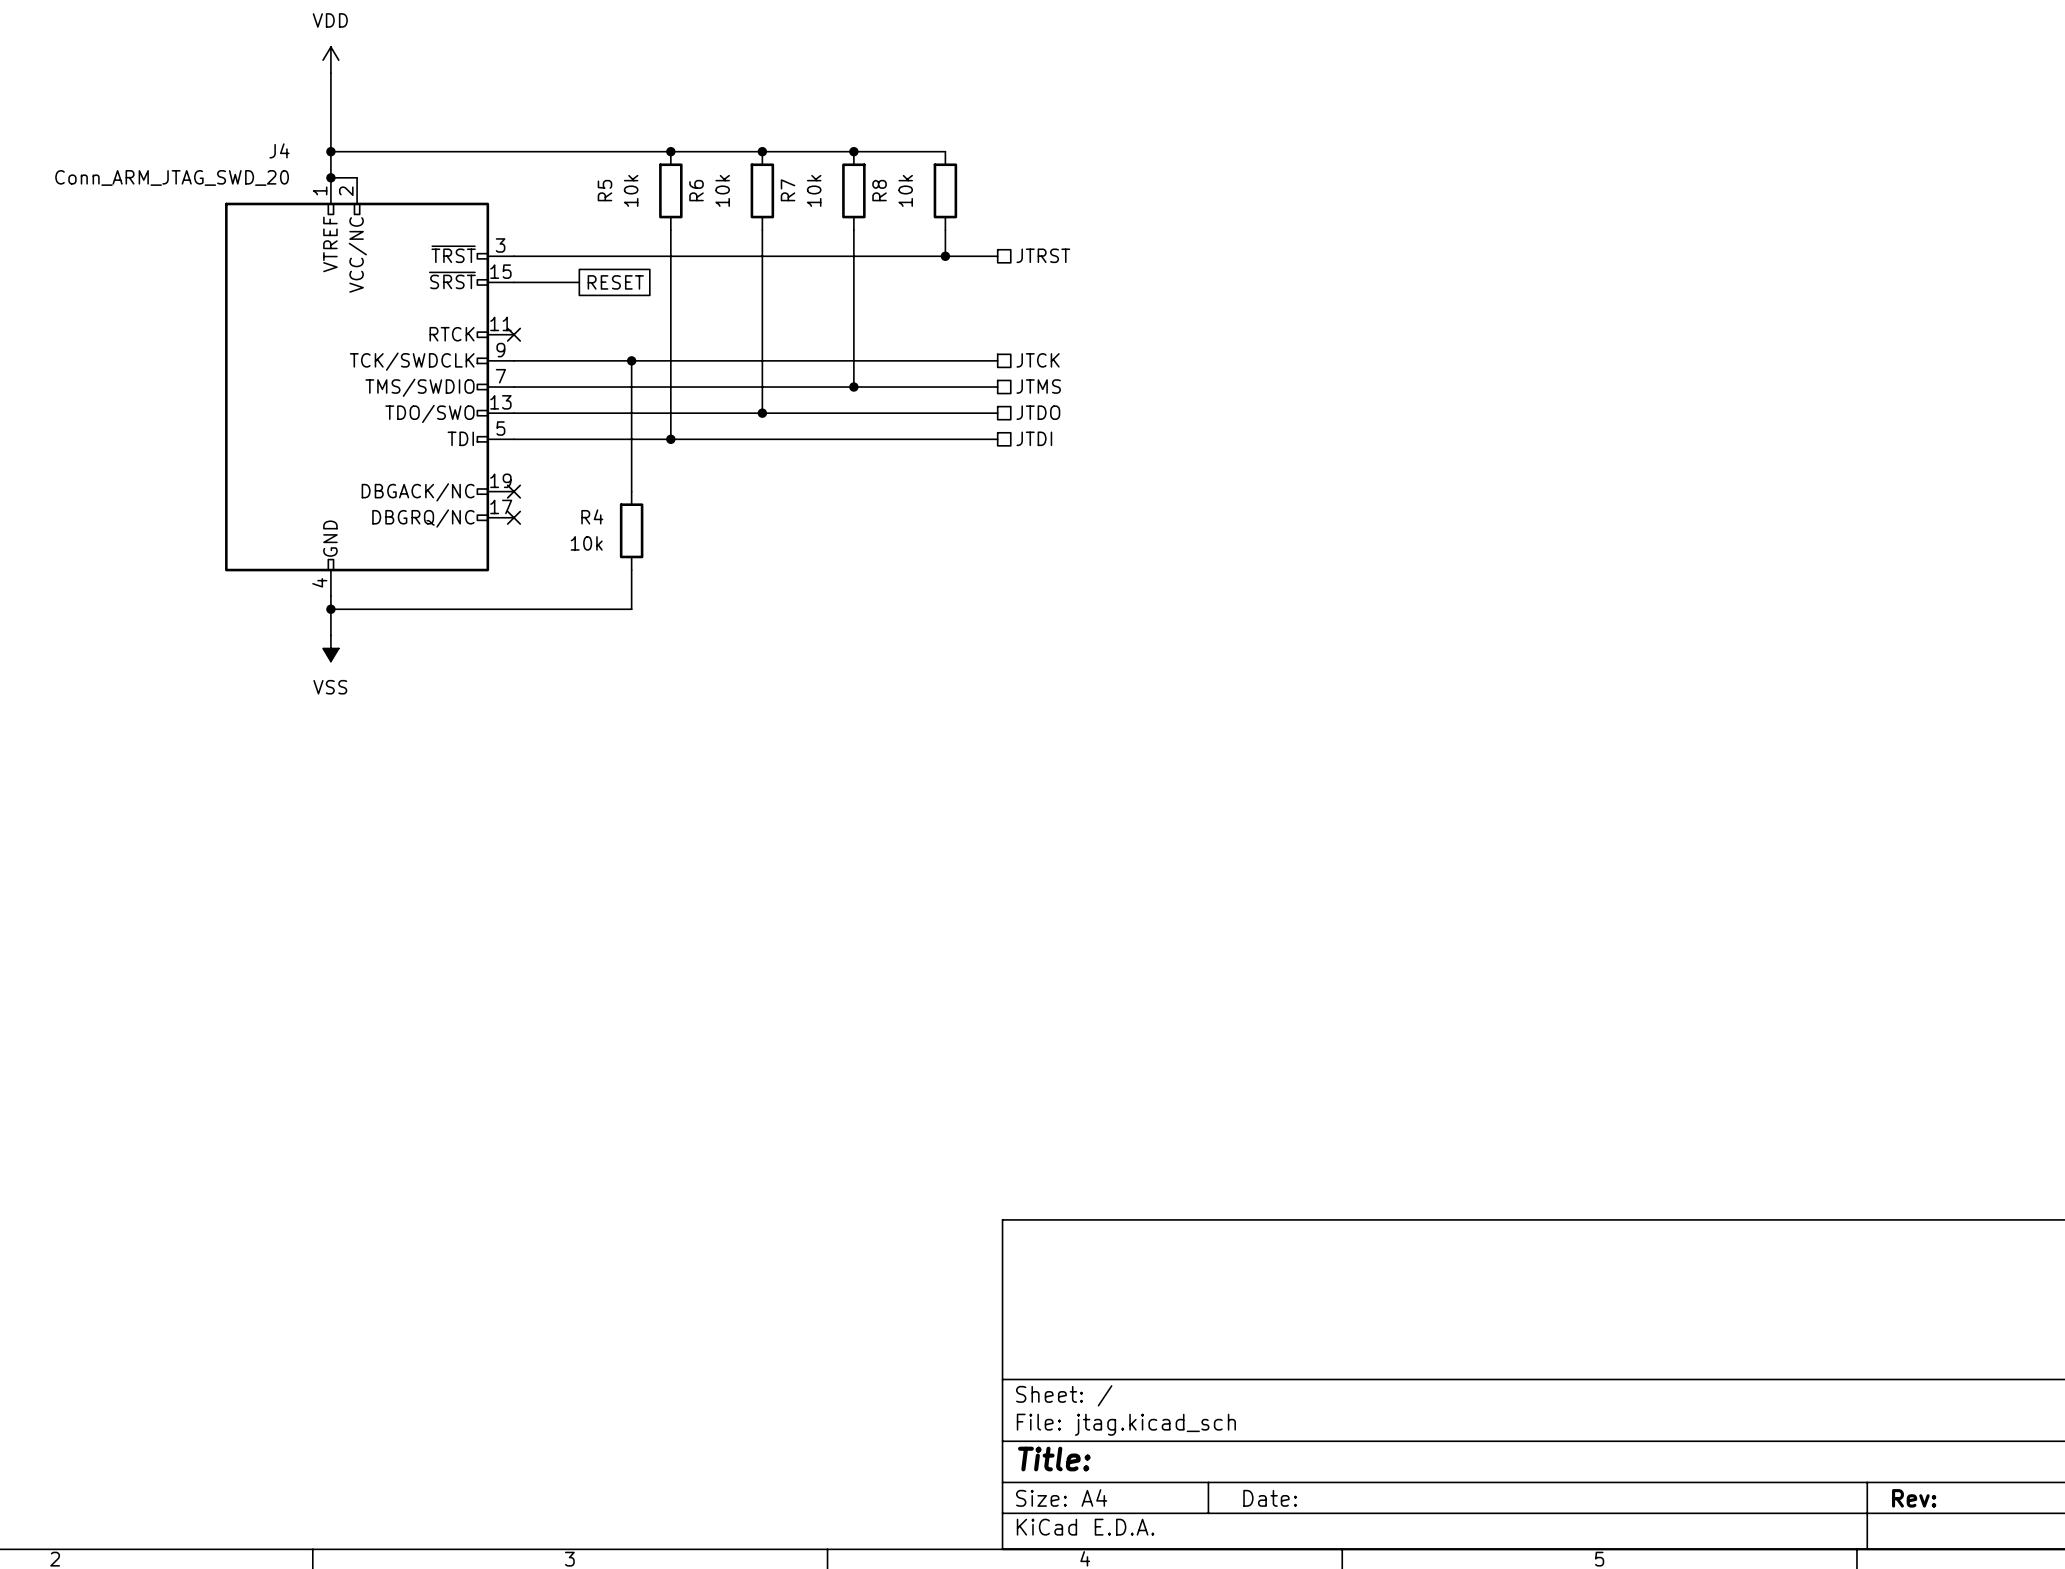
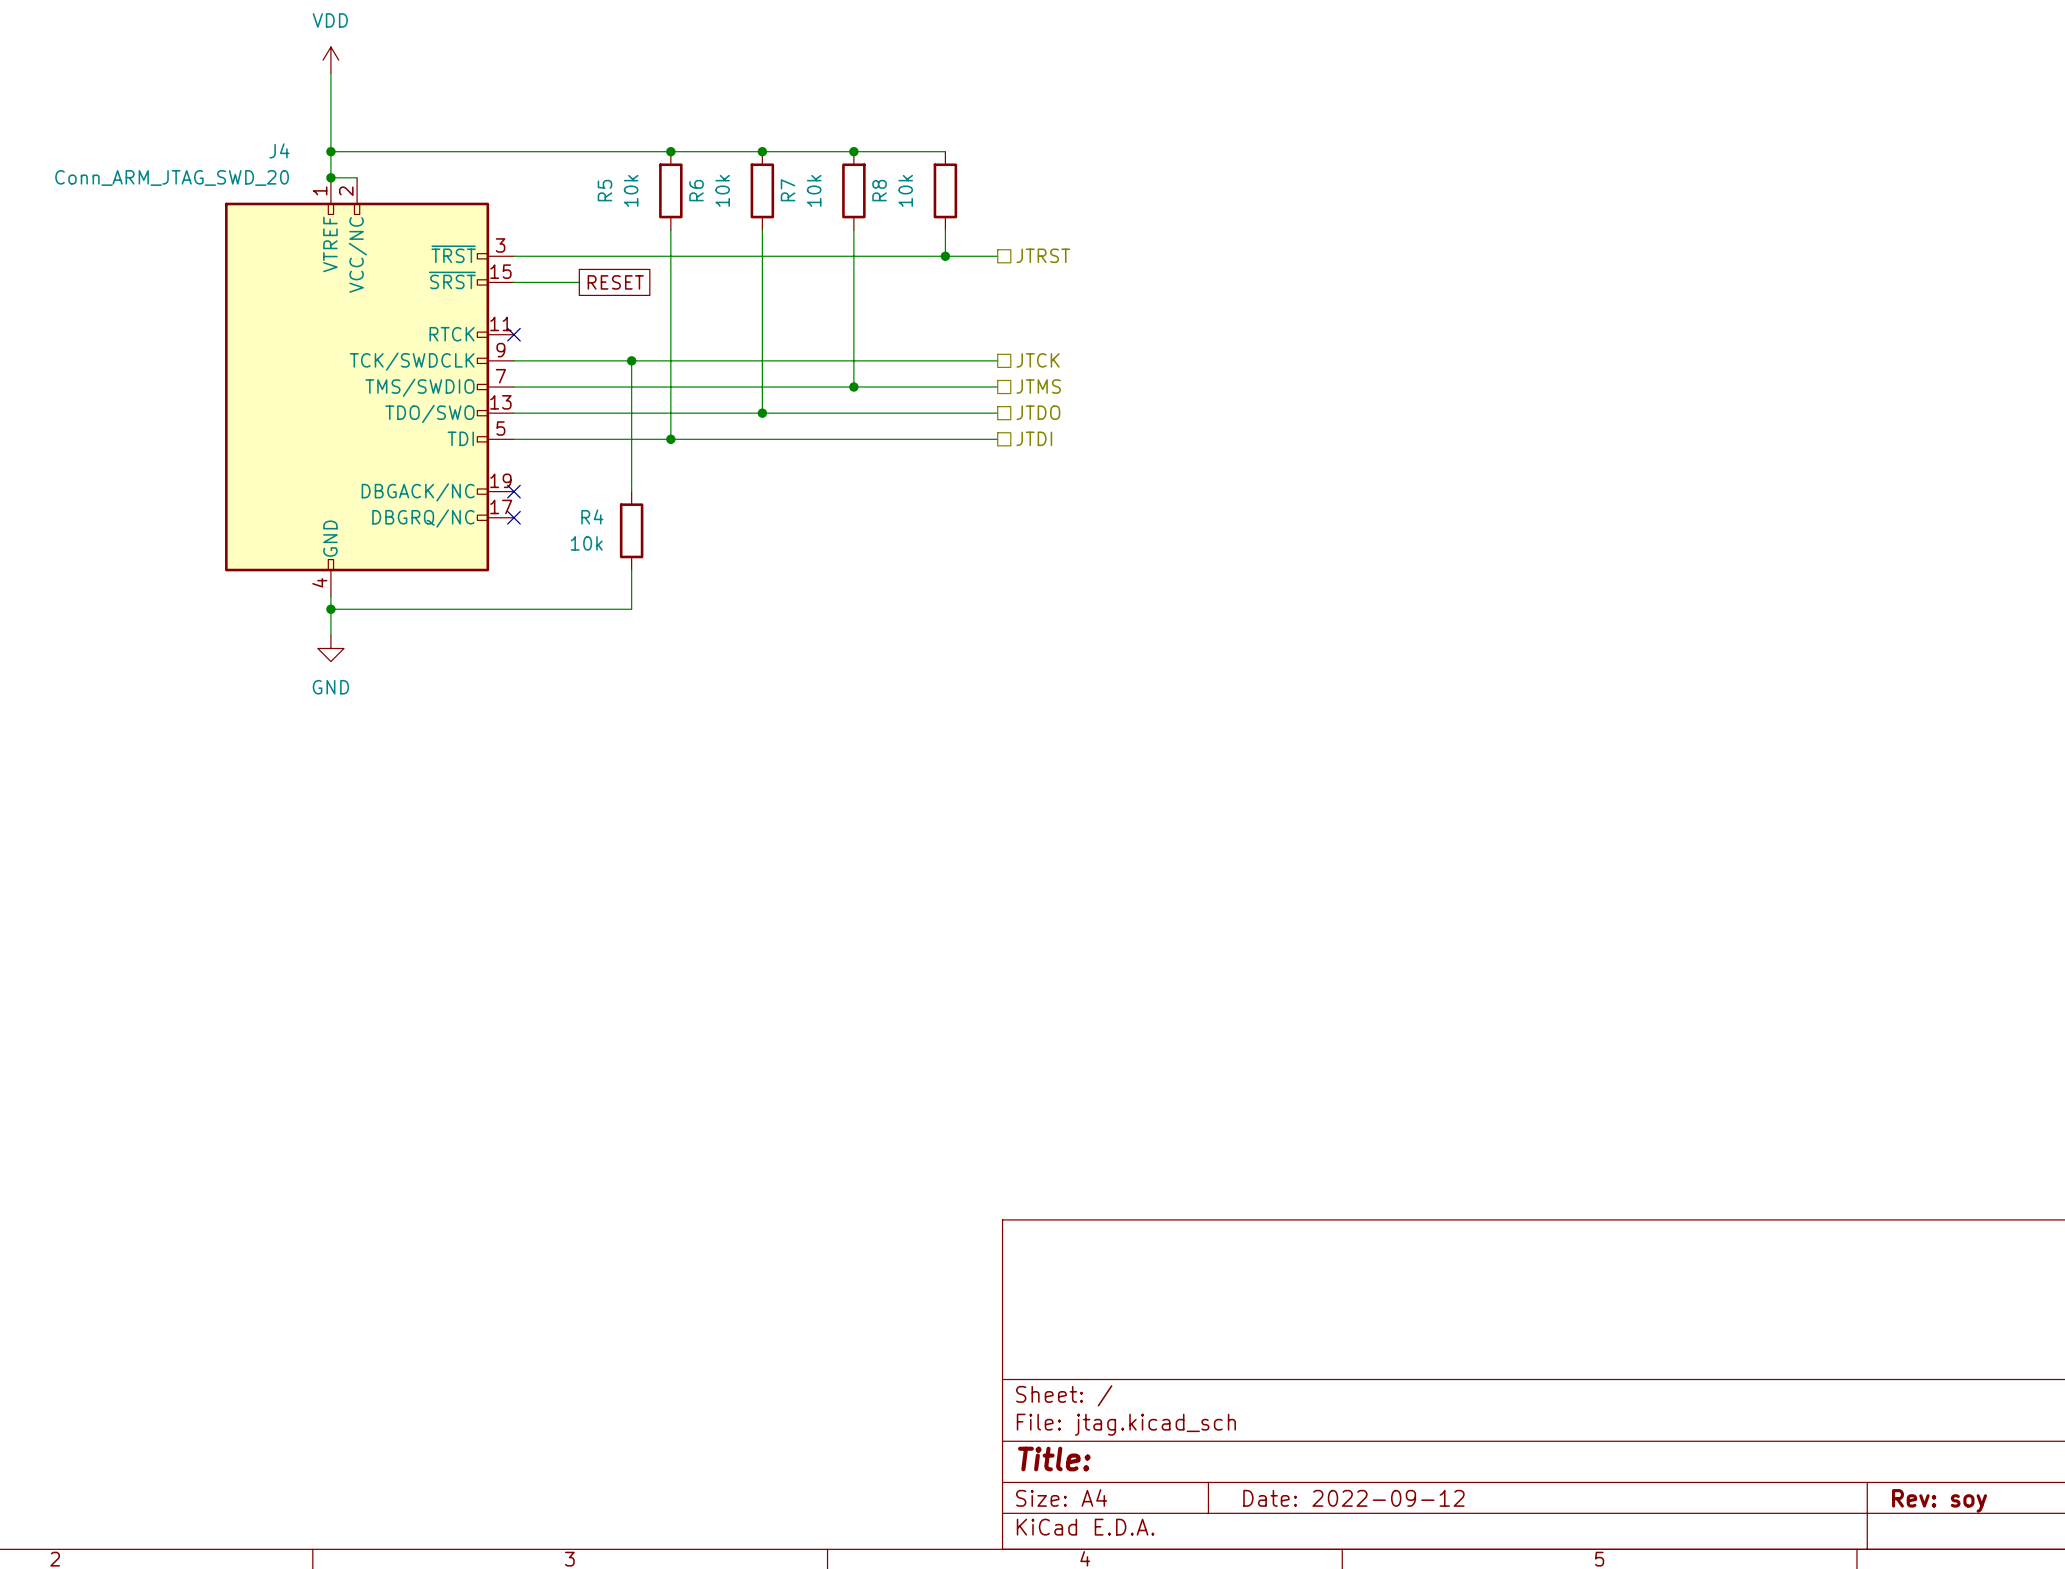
power symbol: VSS (330, 648) -> GND (330, 648)
title block: Date: (1270, 1498) -> Date: 2022-09-12 (1353, 1498)
title block: Rev: (1914, 1498) -> Rev: soy (1939, 1500)

